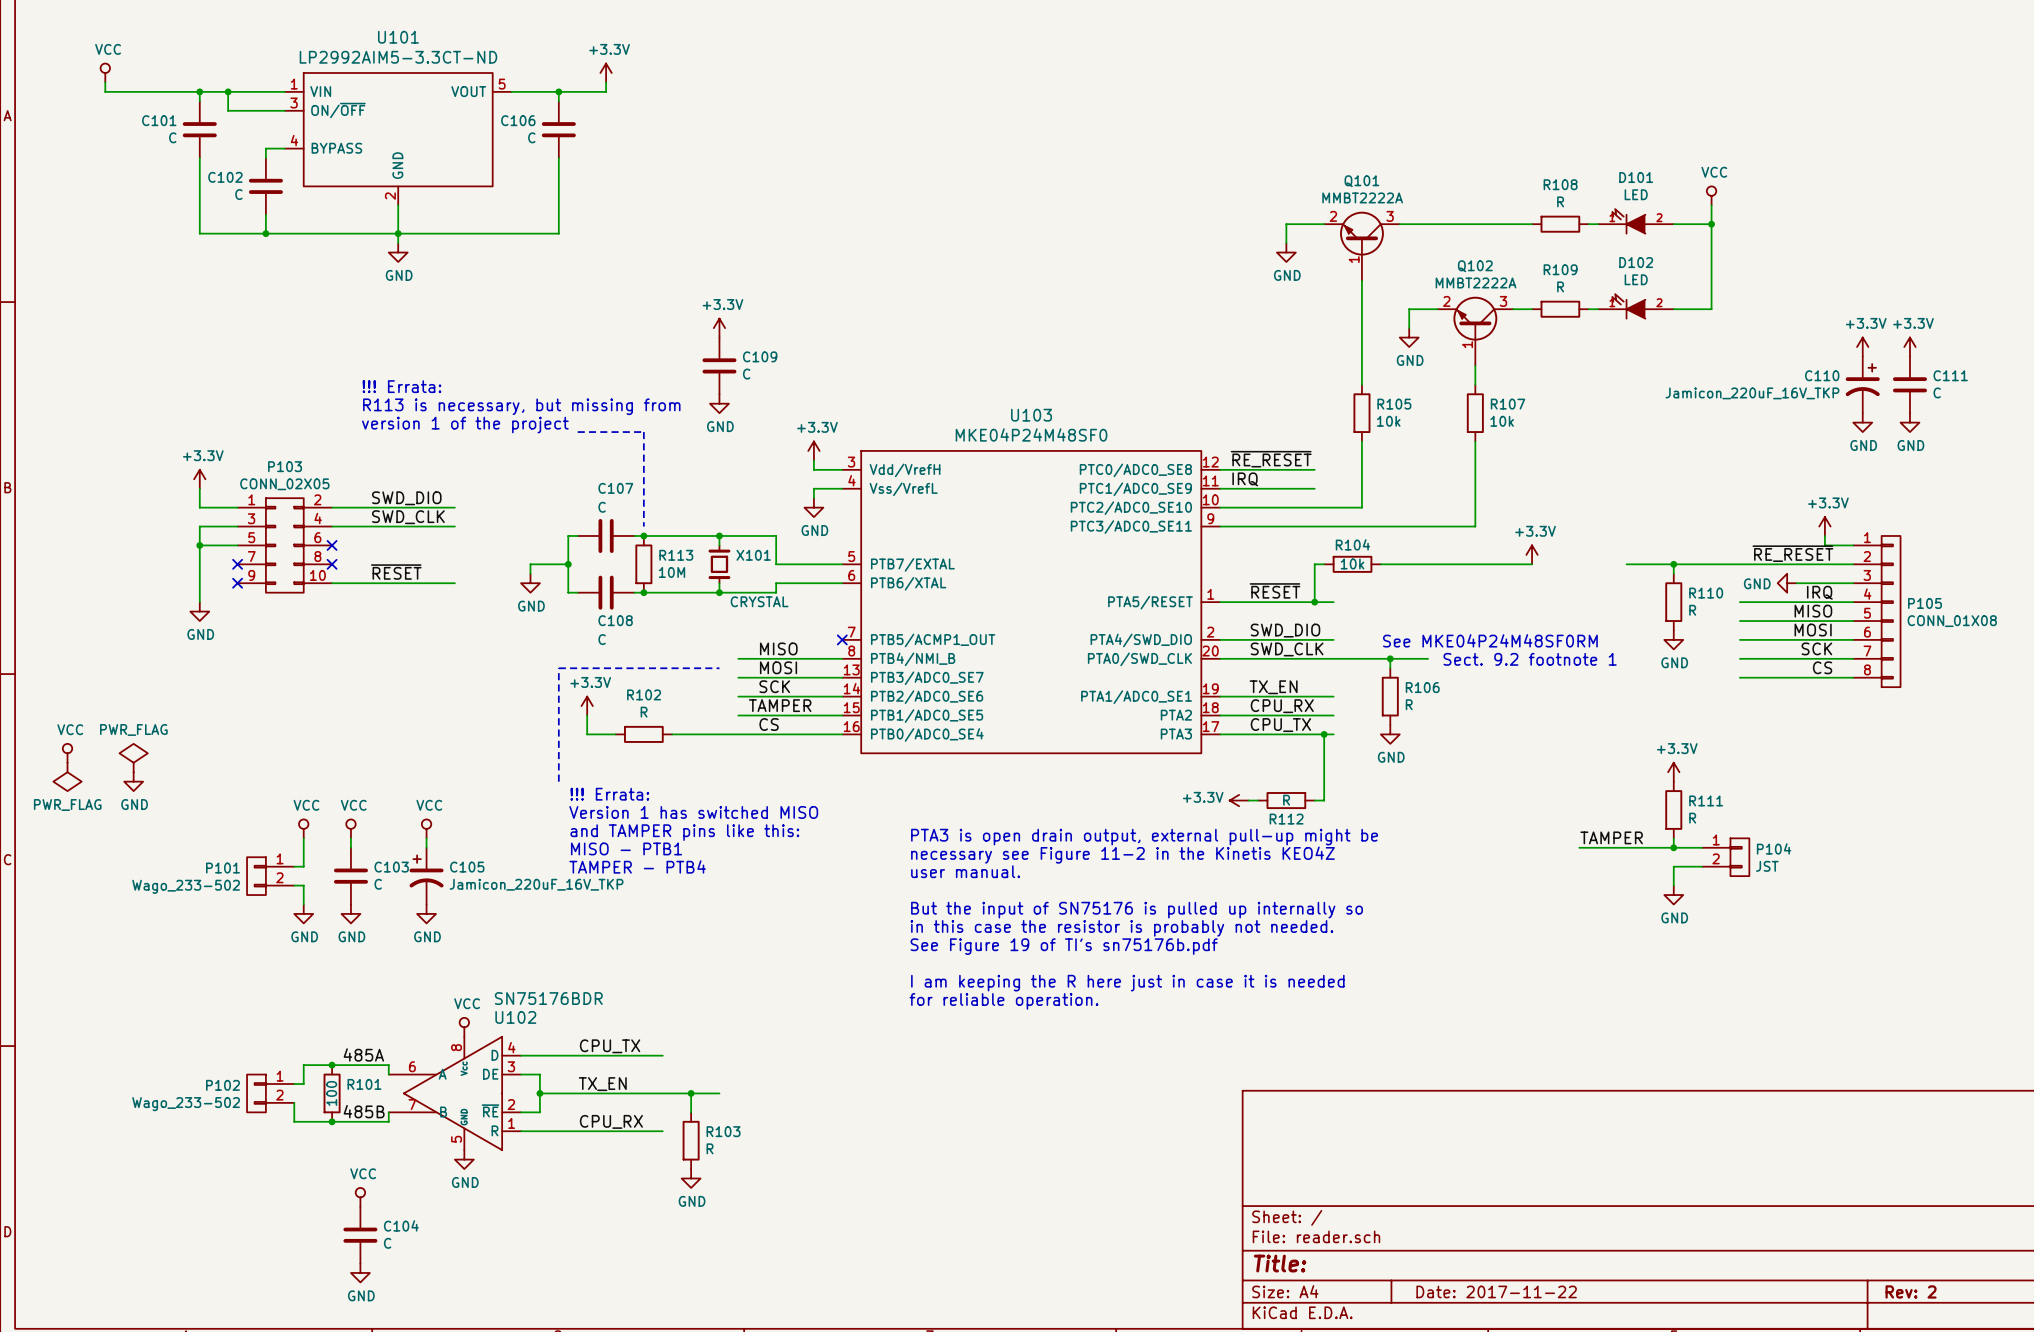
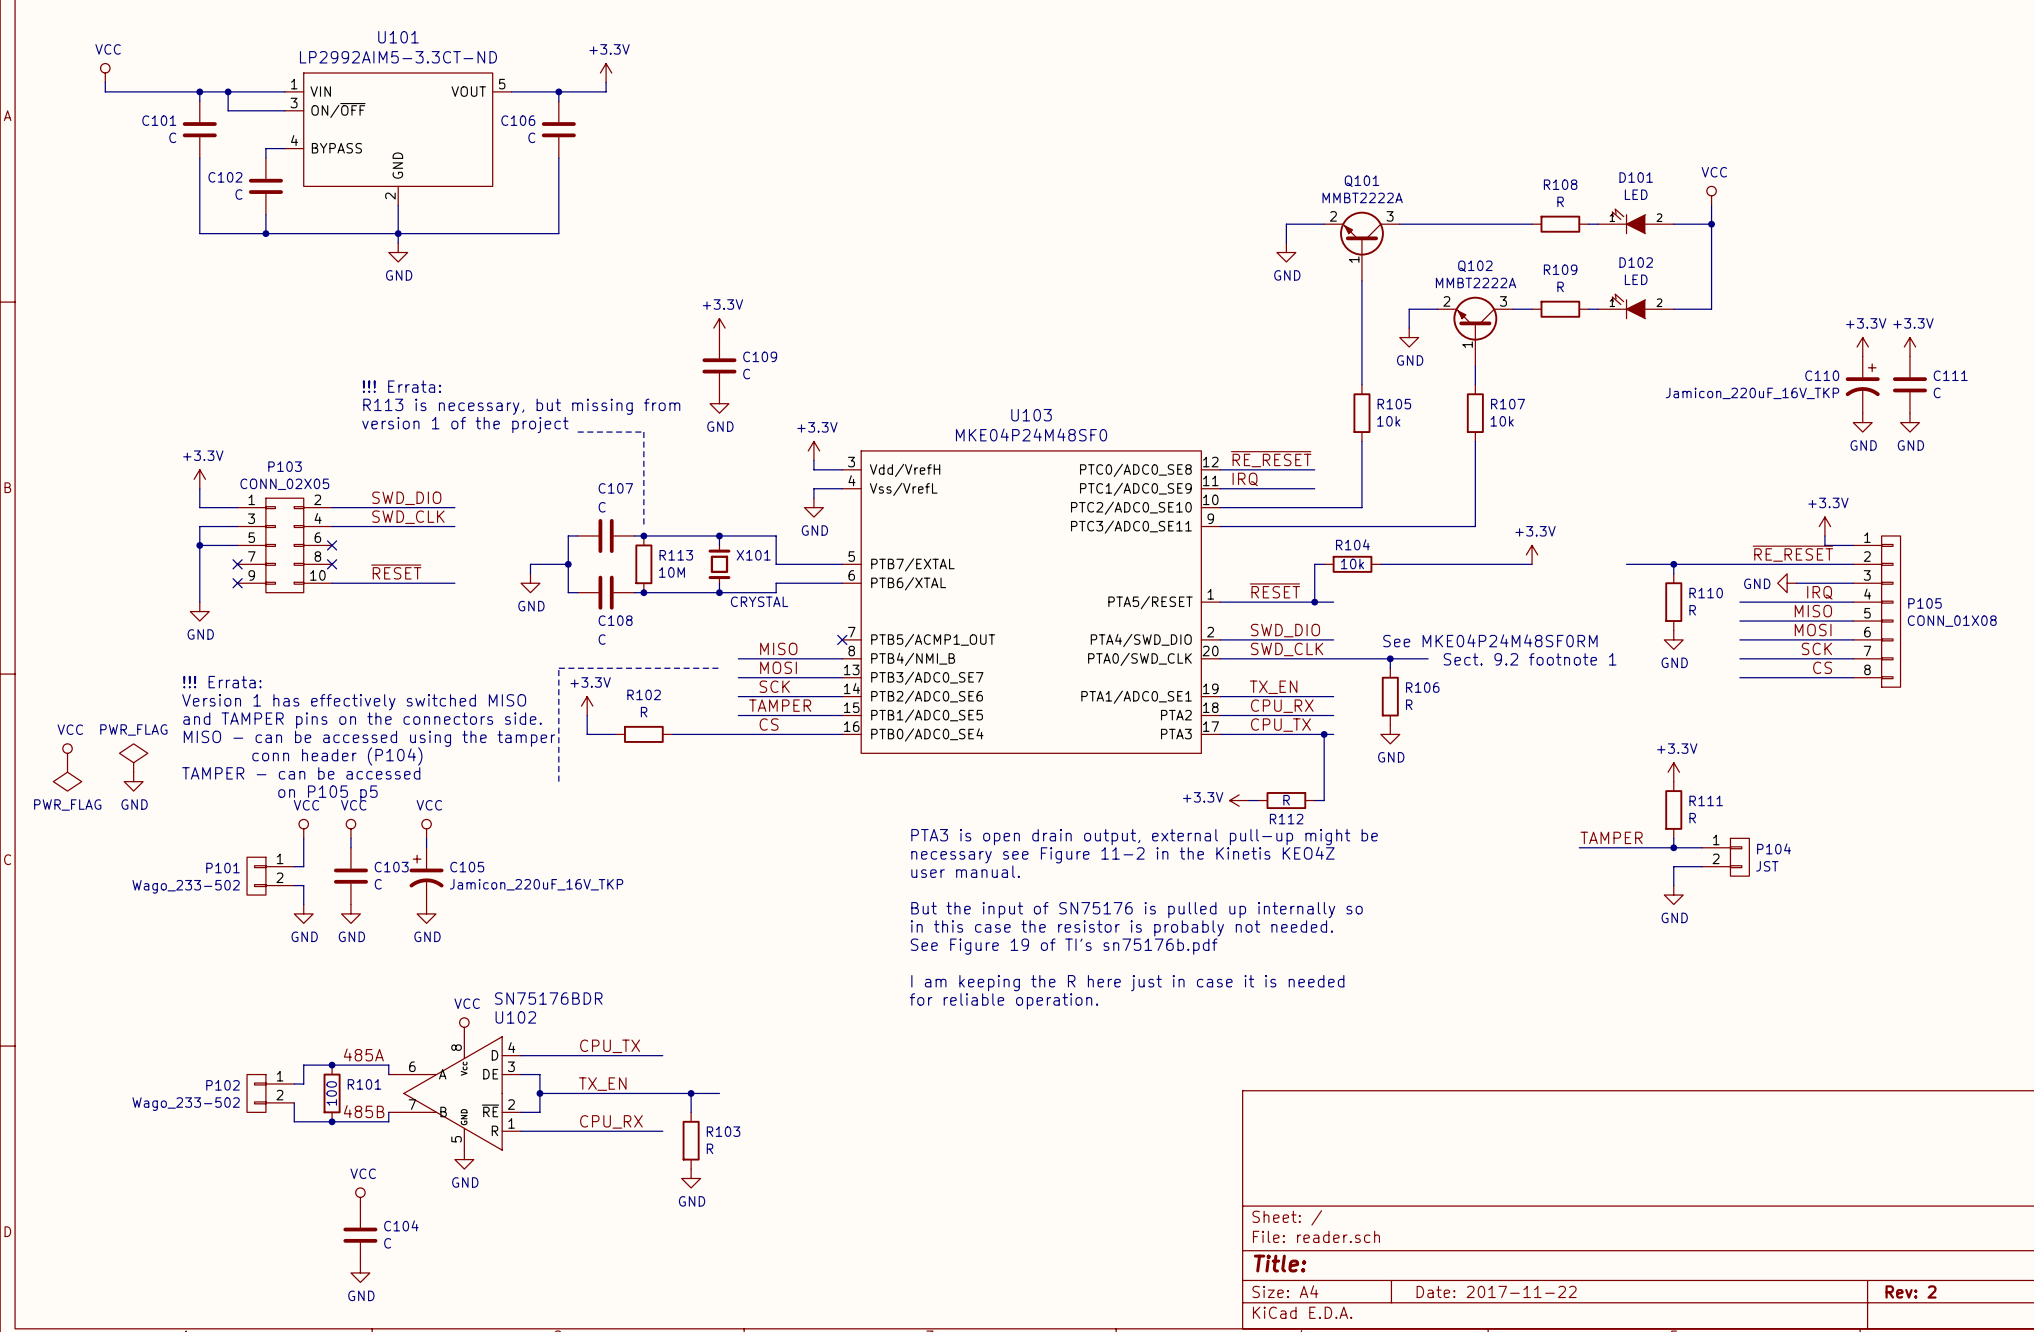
text: none -> !!! Errata: (222, 682)
text: none -> Version 1 has effectively switched MISO (354, 702)
text: none -> and TAMPER pins on the connectors side. (362, 720)
text: none -> MISO - can be accessed using the tamper (369, 738)
text: none -> conn header (P104) (337, 756)
text: none -> TAMPER - can be accessed (301, 773)
text: none -> on P105 p5 (327, 793)
text: !!! Errata: (609, 794) -> none
text: Version 1 has switched MISO (693, 812) -> none
text: and TAMPER pins like this: (684, 832) -> none
text: MISO - PTB1 (626, 848) -> none
text: TAMPER - PTB4 (637, 866) -> none

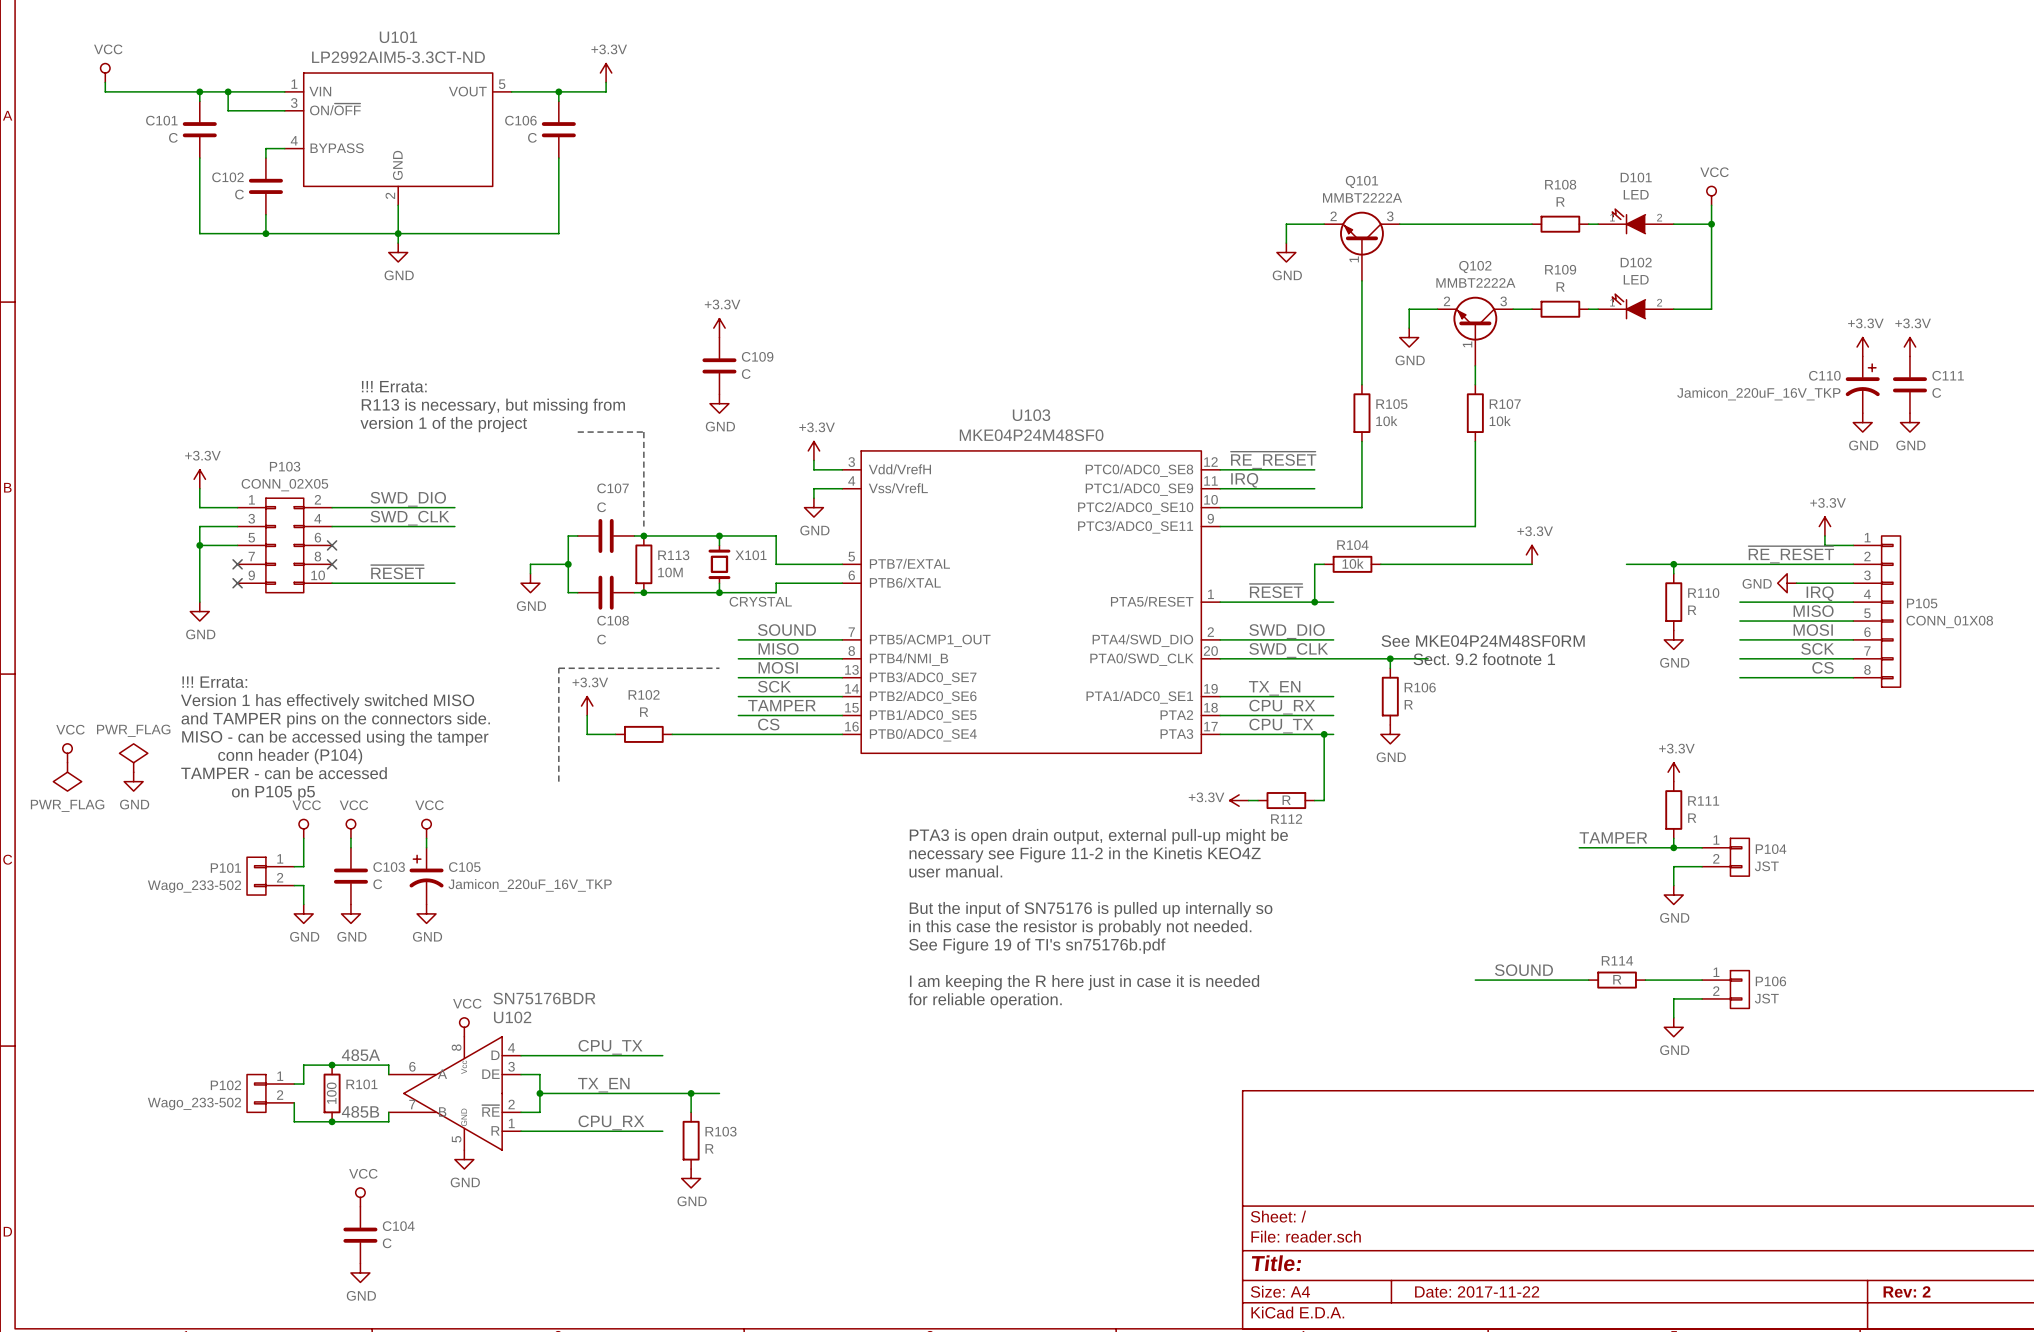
label: none -> SOUND (786, 630)
wire: none -> (738, 639) (842, 639)
no-connect mark: (842, 639) -> none
label: none -> SOUND (1523, 970)
wire: none -> (1475, 980) (1588, 980)
R114: none -> R (1617, 980)
wire: none -> (1645, 980) (1702, 980)
P106: none -> JST (1725, 989)
wire: none -> (1702, 998) (1673, 998) (1673, 1017)
power symbol: none -> GND (1673, 1027)

